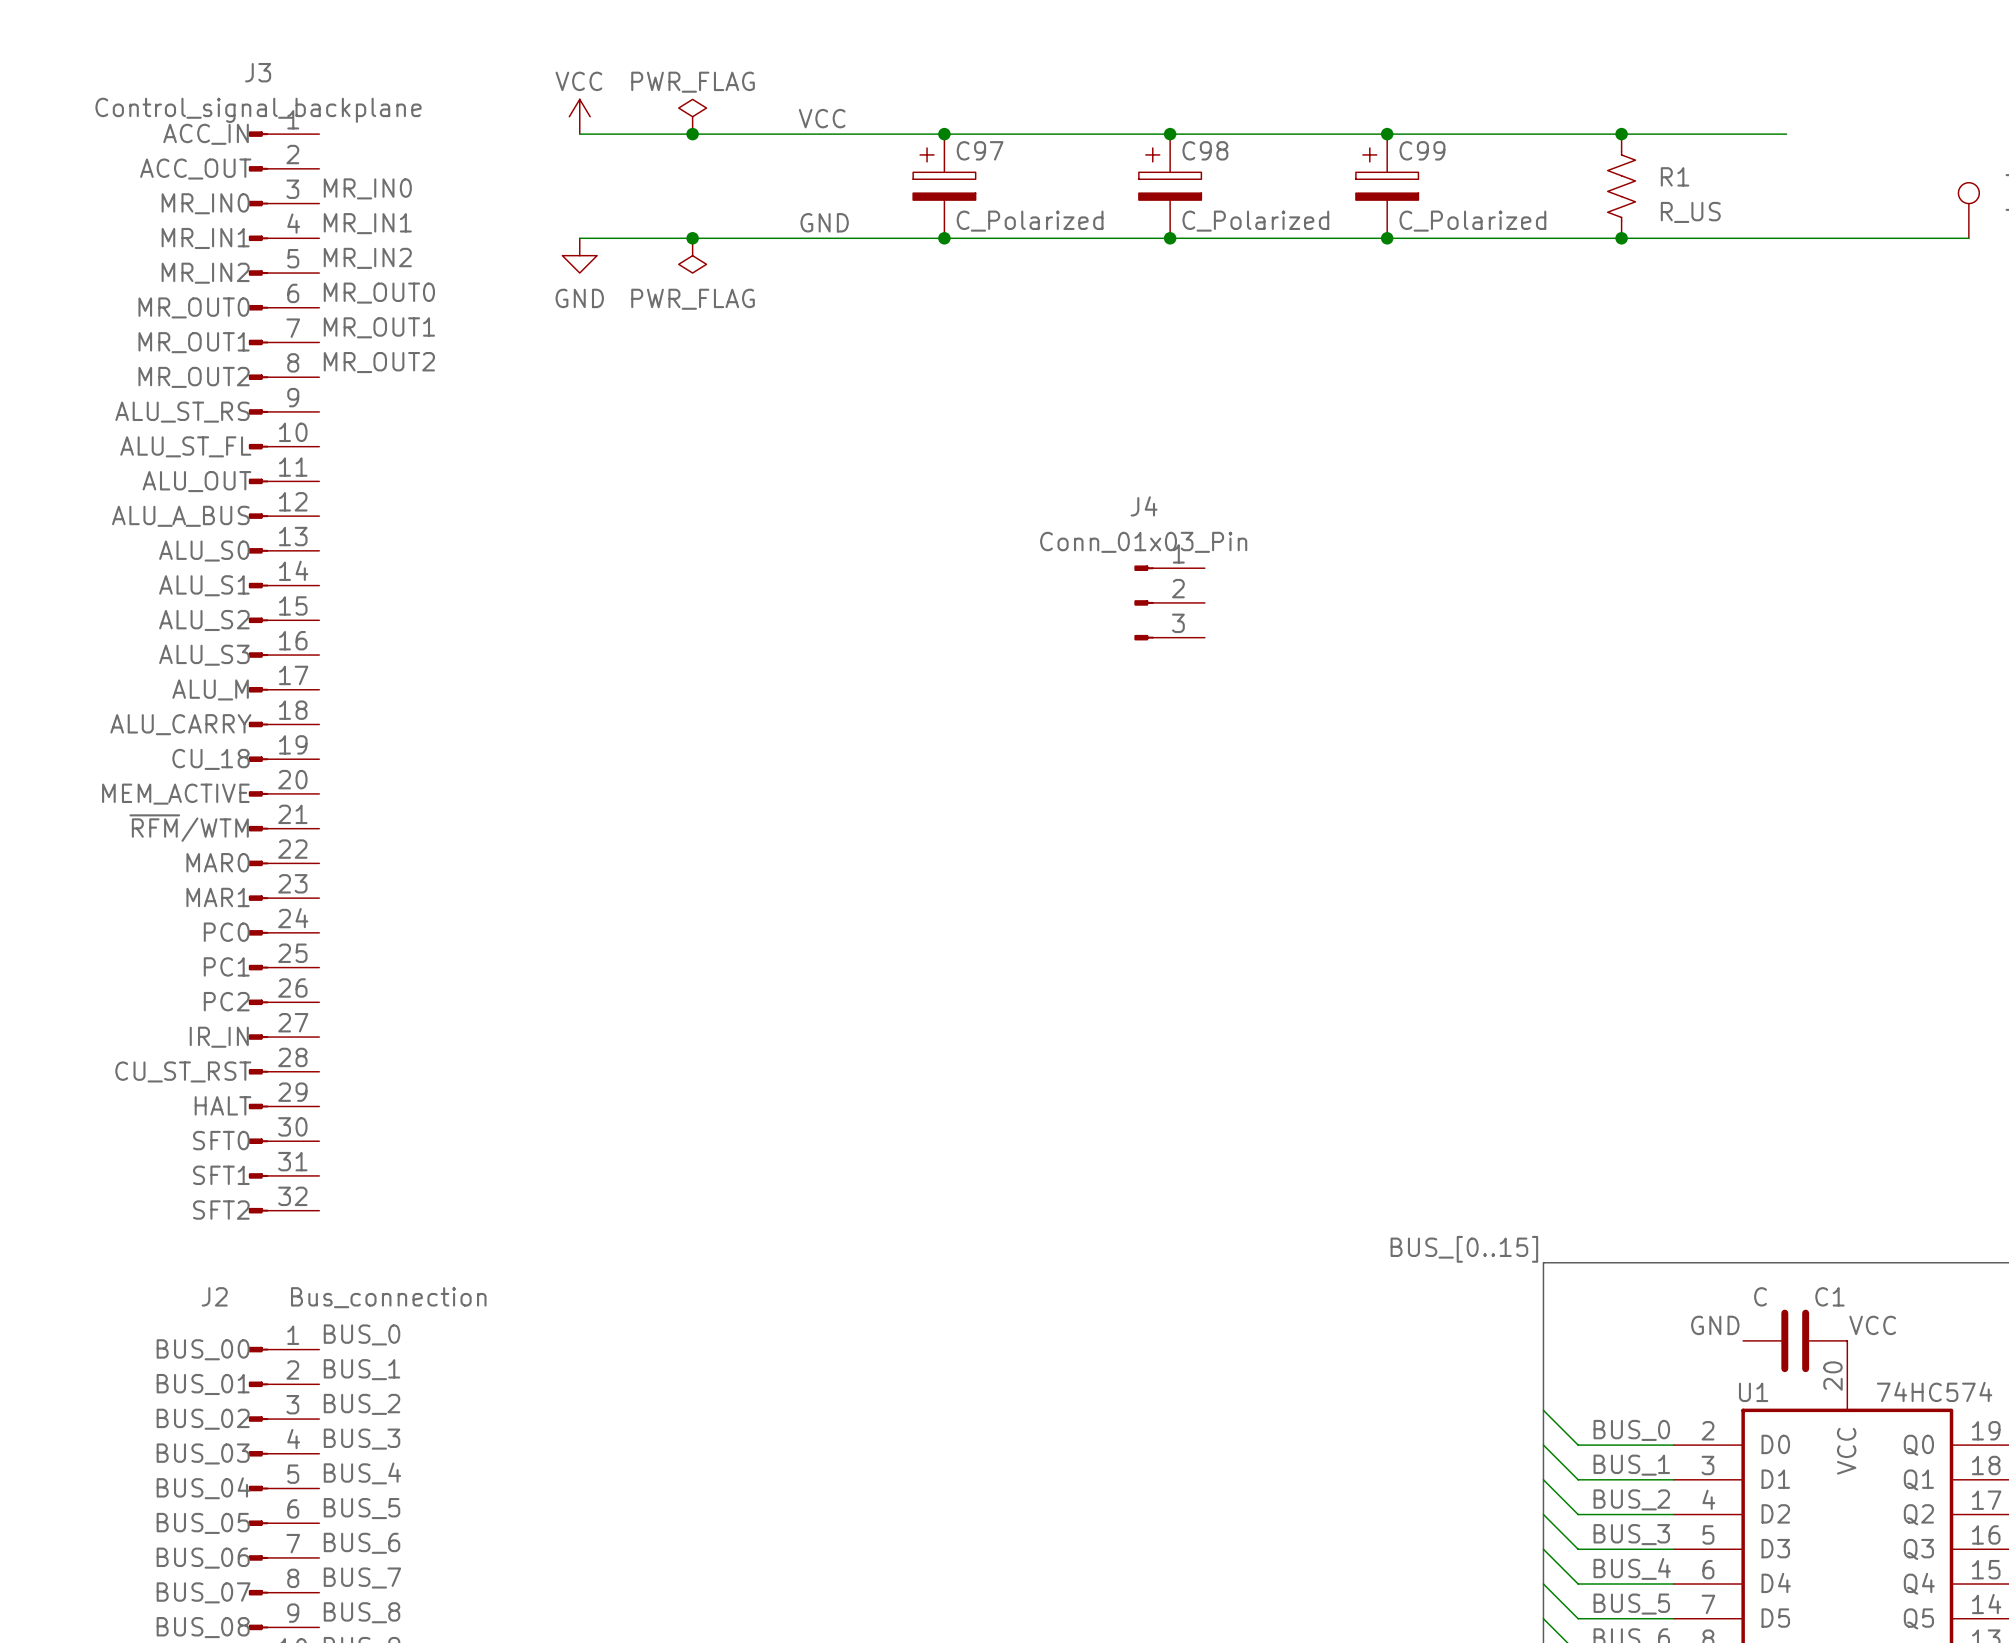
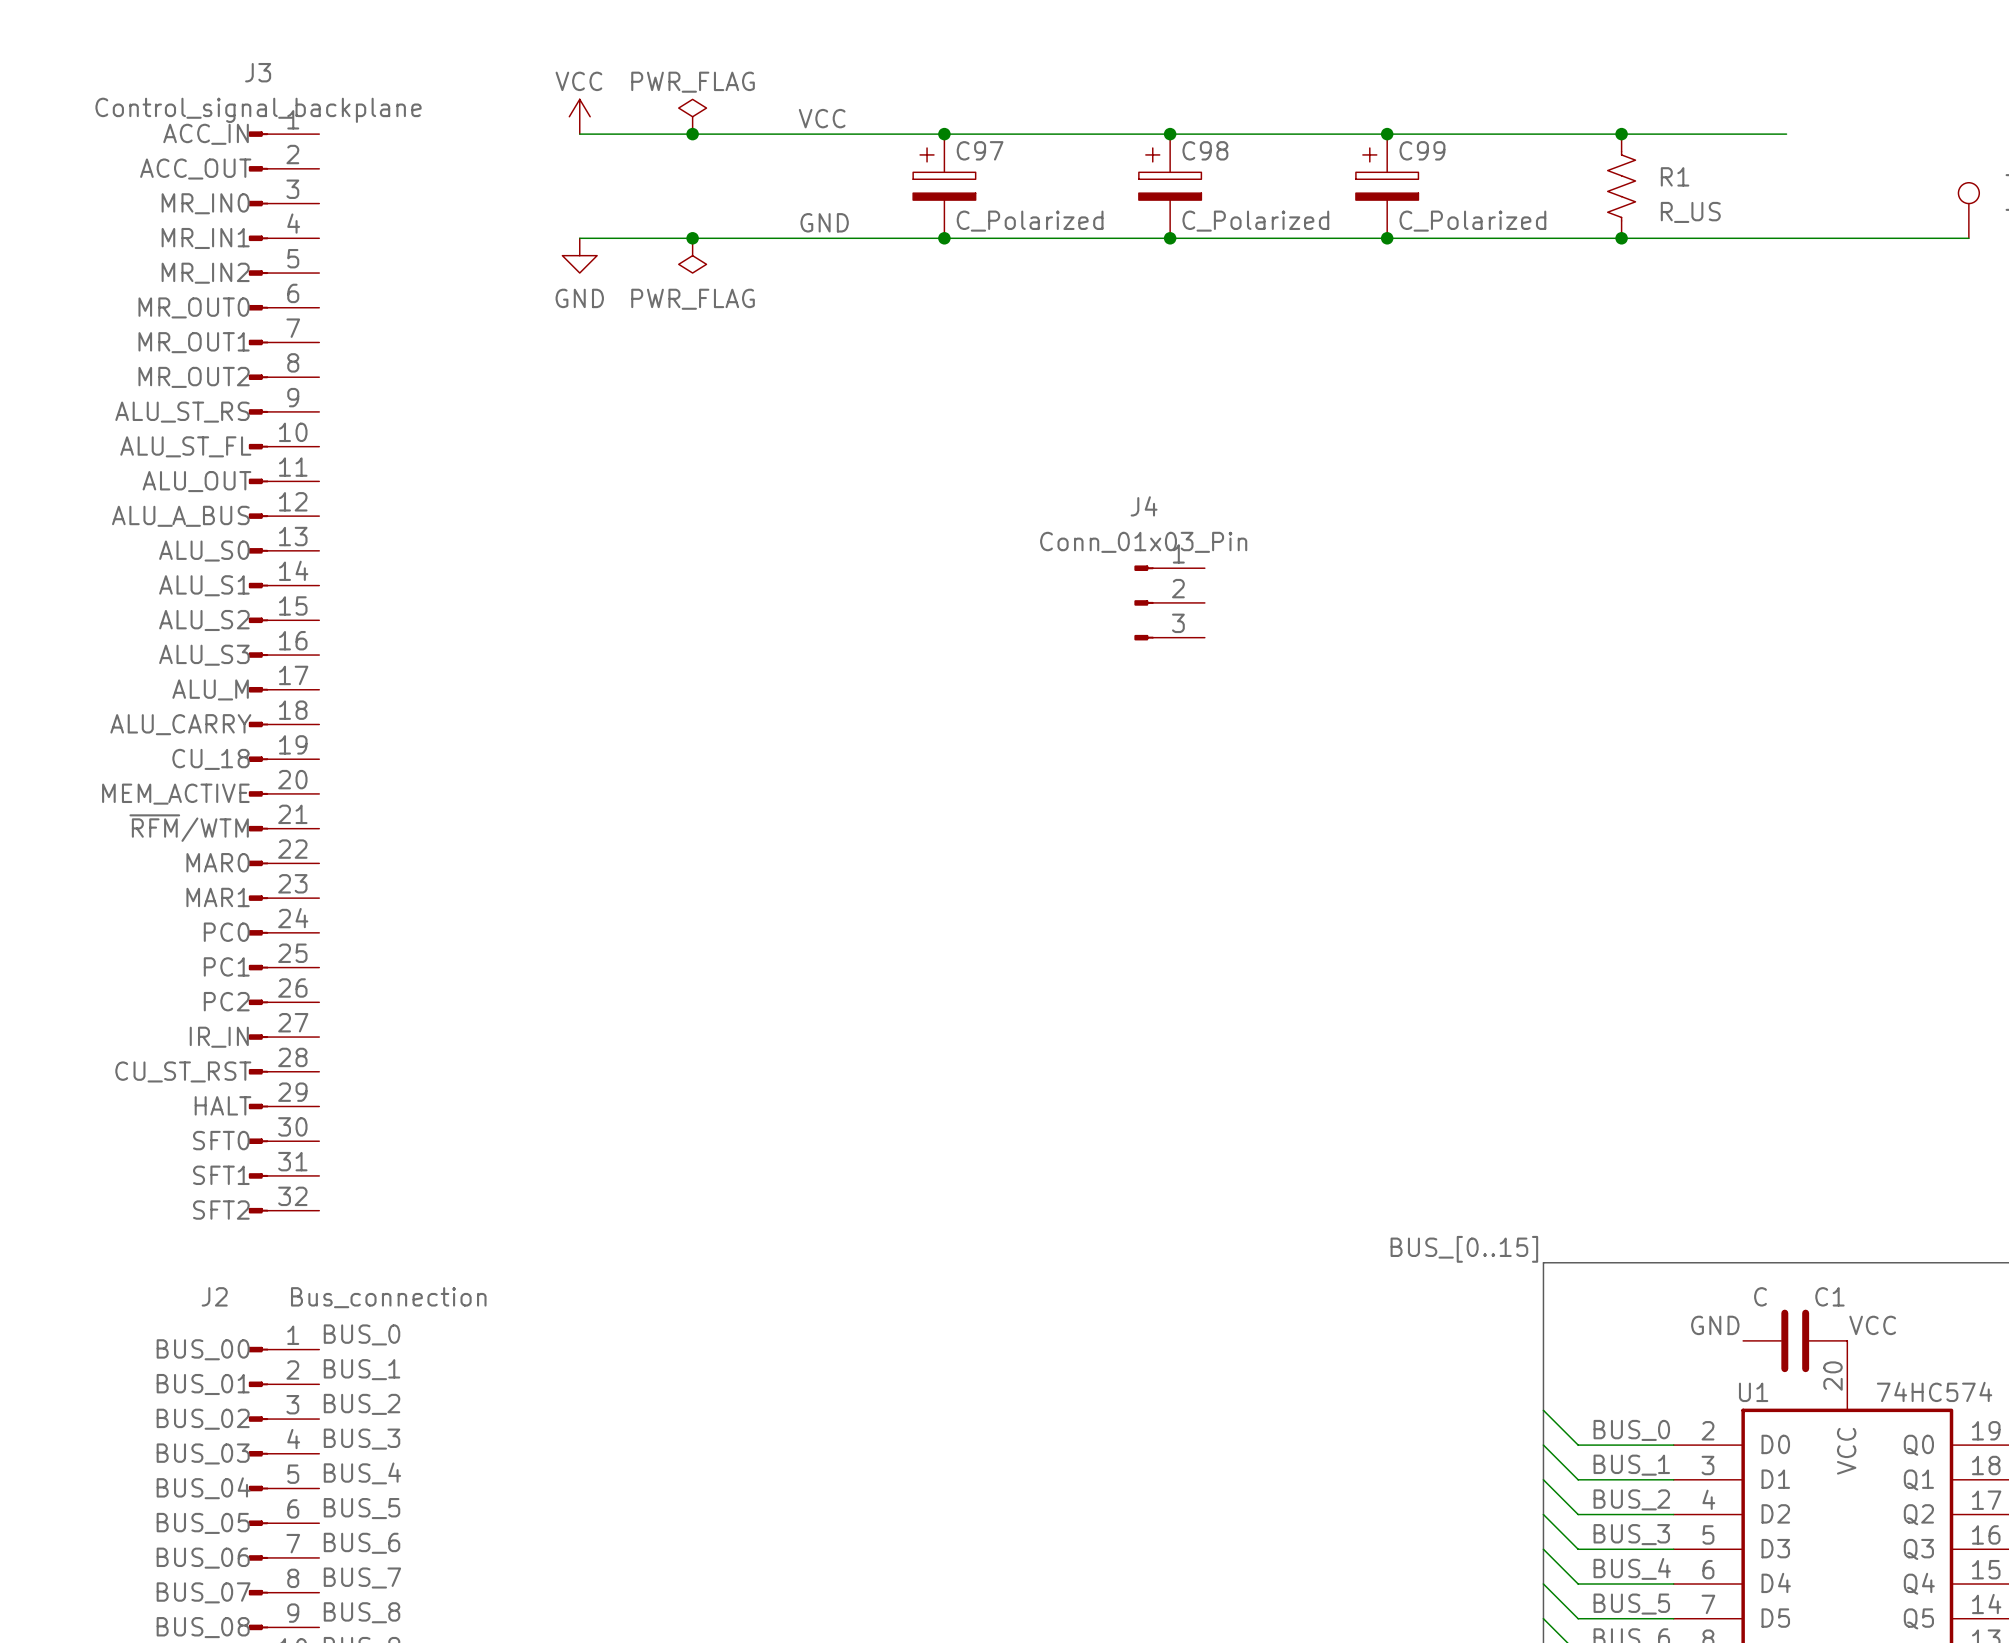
label: MR_IN0 (367, 188) -> none
label: MR_IN1 (367, 223) -> none
label: MR_IN2 (367, 258) -> none
label: MR_OUT0 (379, 293) -> none
label: MR_OUT1 (379, 327) -> none
label: MR_OUT2 (379, 362) -> none

